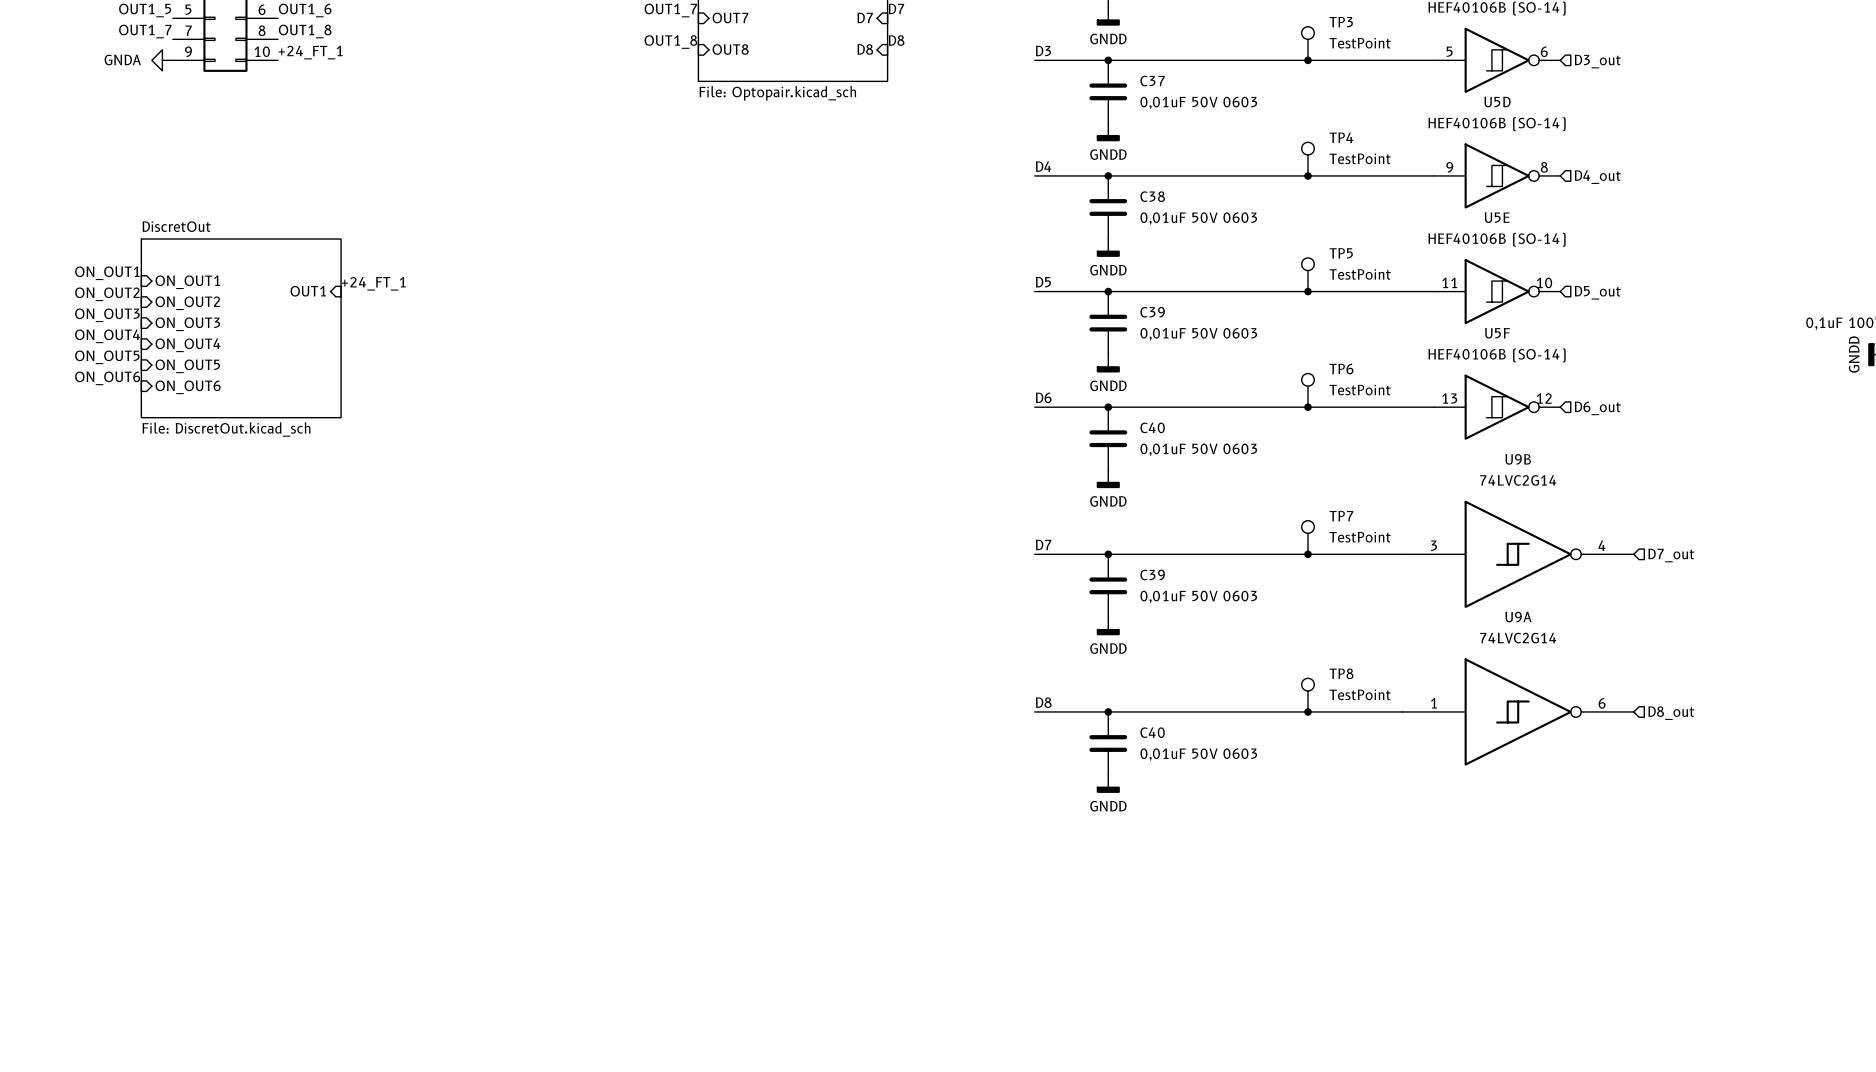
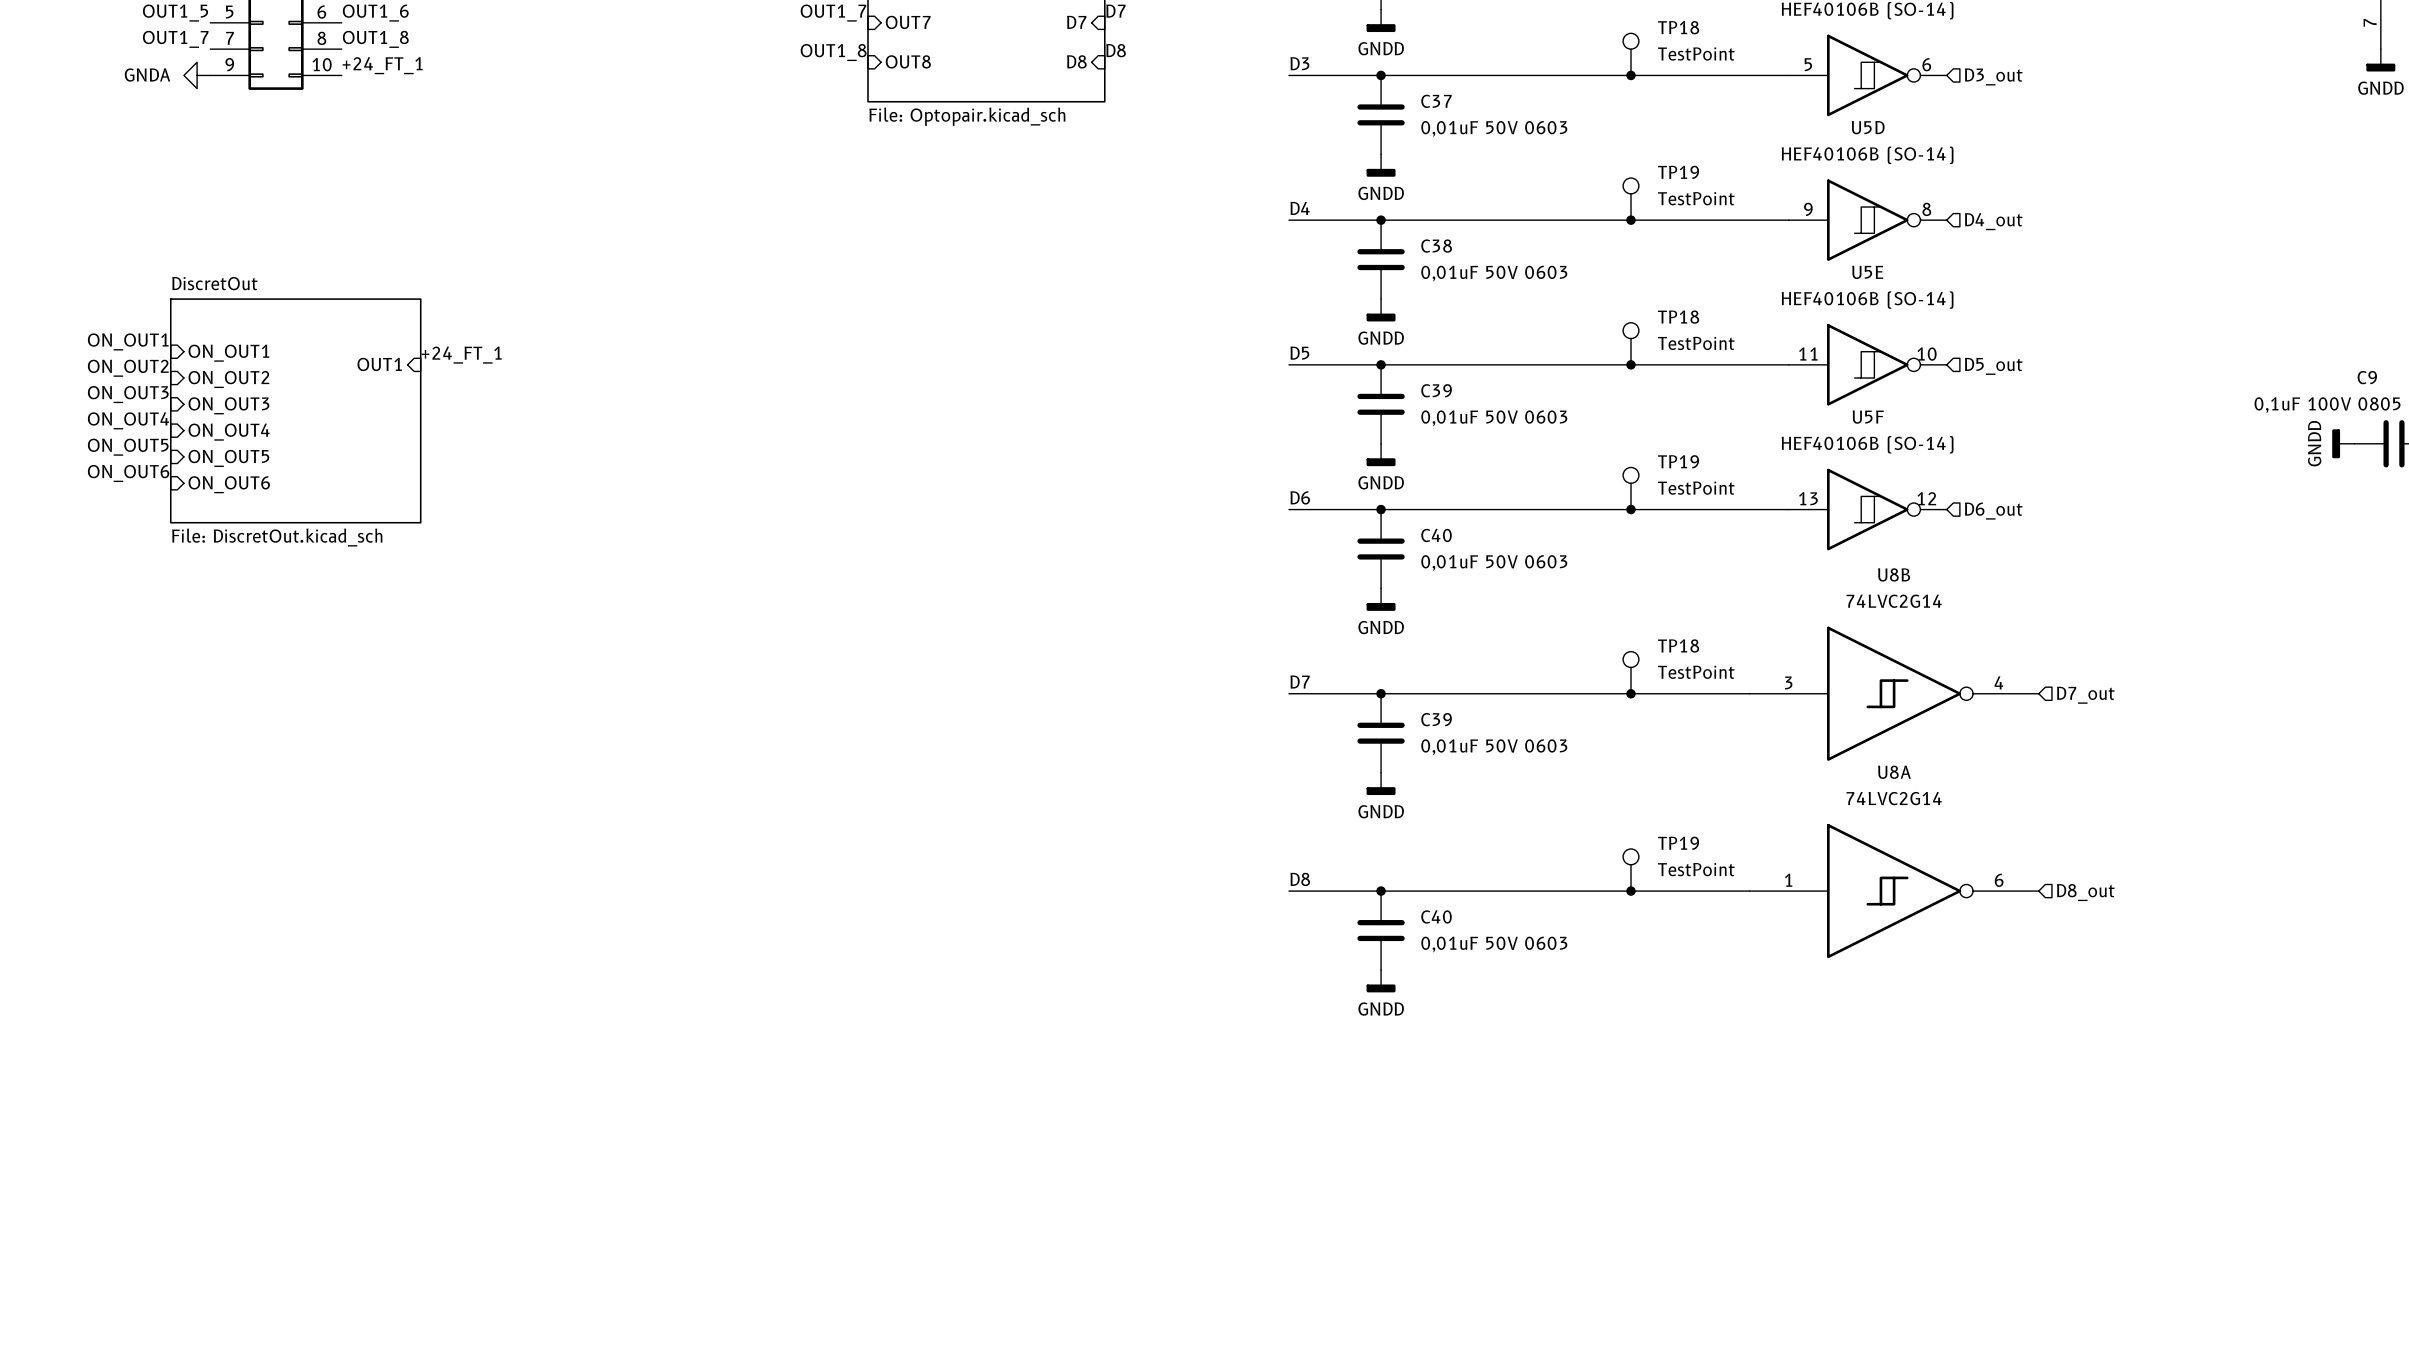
TP3 name: TP3 (1341, 22) -> TP18 (1678, 27)
TP4 name: TP4 (1341, 137) -> TP19 (1678, 172)
TP5 name: TP5 (1341, 253) -> TP18 (1678, 317)
TP6 name: TP6 (1341, 369) -> TP19 (1678, 461)
U9B name: U9B (1518, 459) -> U8B (1894, 574)
TP7 name: TP7 (1341, 516) -> TP18 (1678, 645)
U9A name: U9A (1518, 617) -> U8A (1894, 772)
TP8 name: TP8 (1341, 673) -> TP19 (1678, 843)

